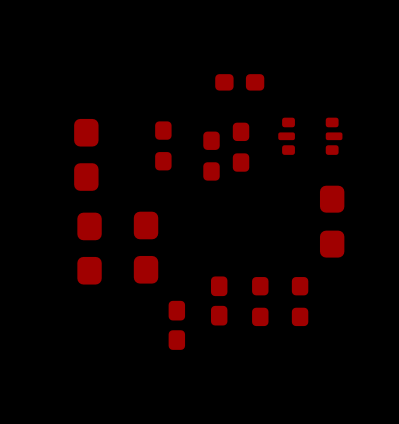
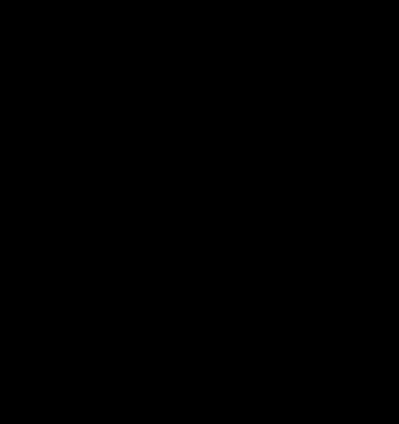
part: (239, 82) -> none
part: (310, 136) -> none
part: (163, 145) -> none
part: (241, 147) -> none
part: (86, 154) -> none
part: (211, 156) -> none
part: (332, 221) -> none
part: (146, 247) -> none
part: (89, 248) -> none
part: (219, 300) -> none
part: (260, 301) -> none
part: (300, 301) -> none
part: (176, 325) -> none

